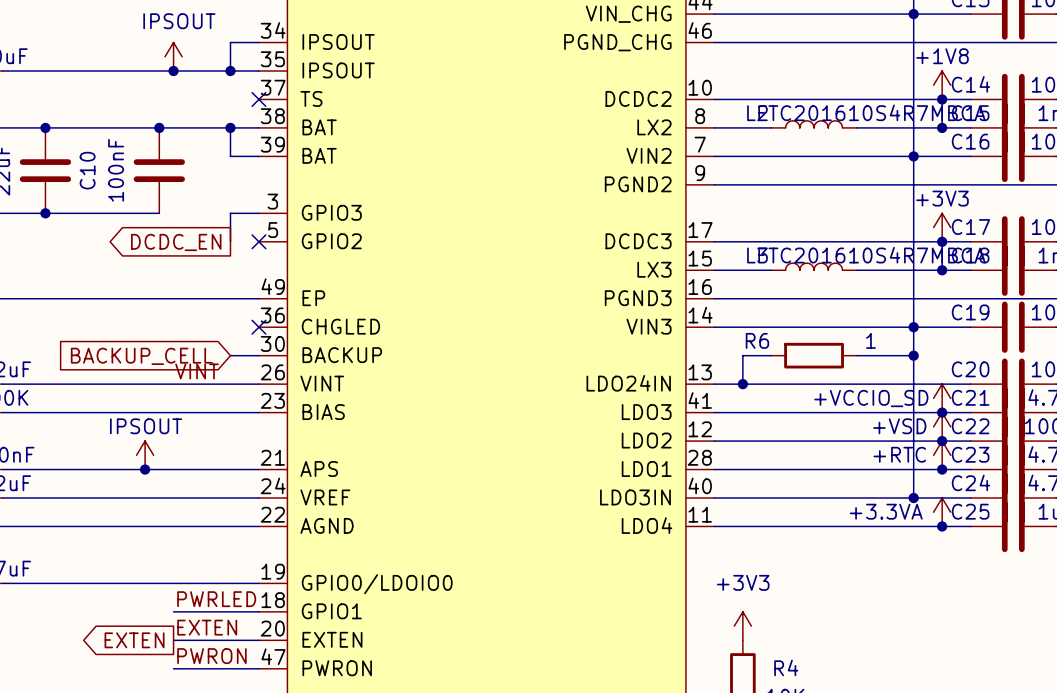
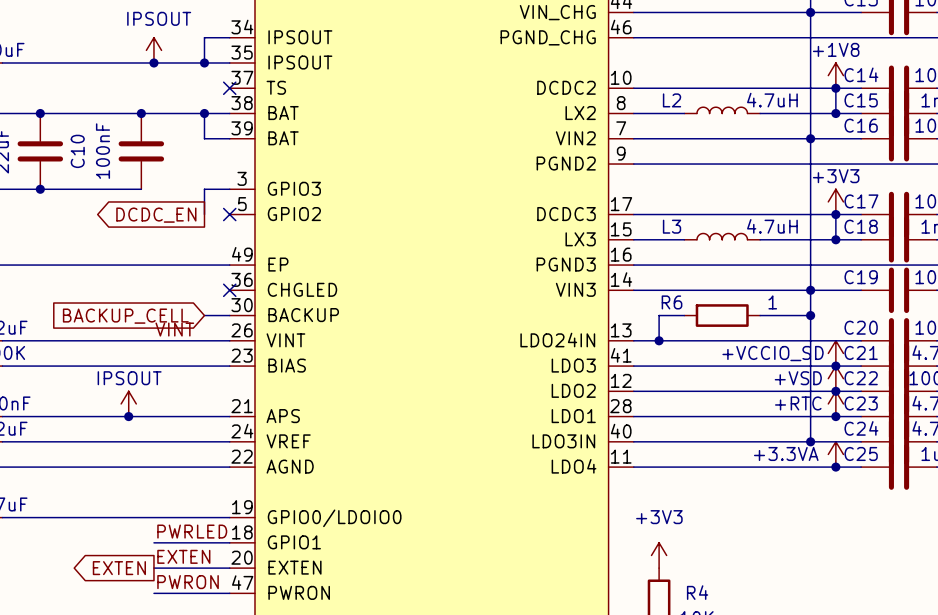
L2 value: FTC201610S4R7MBCA (871, 112) -> 4.7uH (772, 100)
L3 value: FTC201610S4R7MBCA (871, 255) -> 4.7uH (772, 226)

